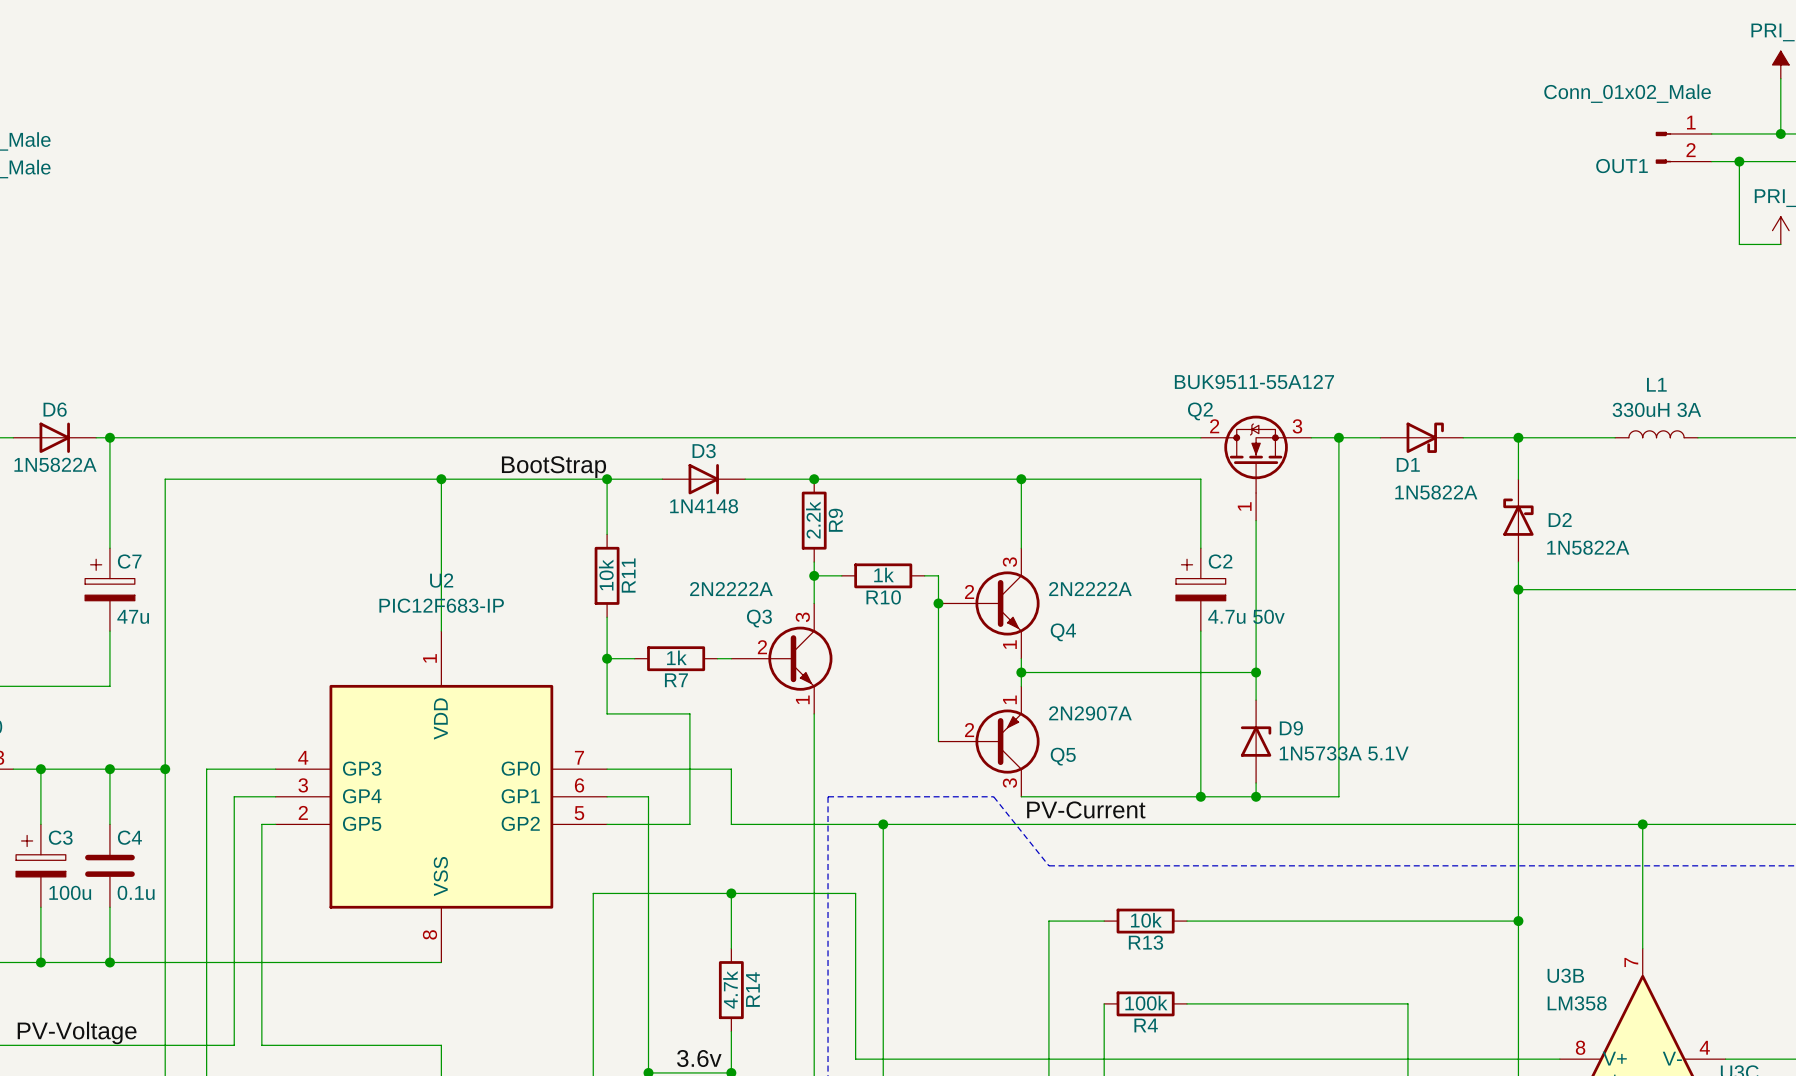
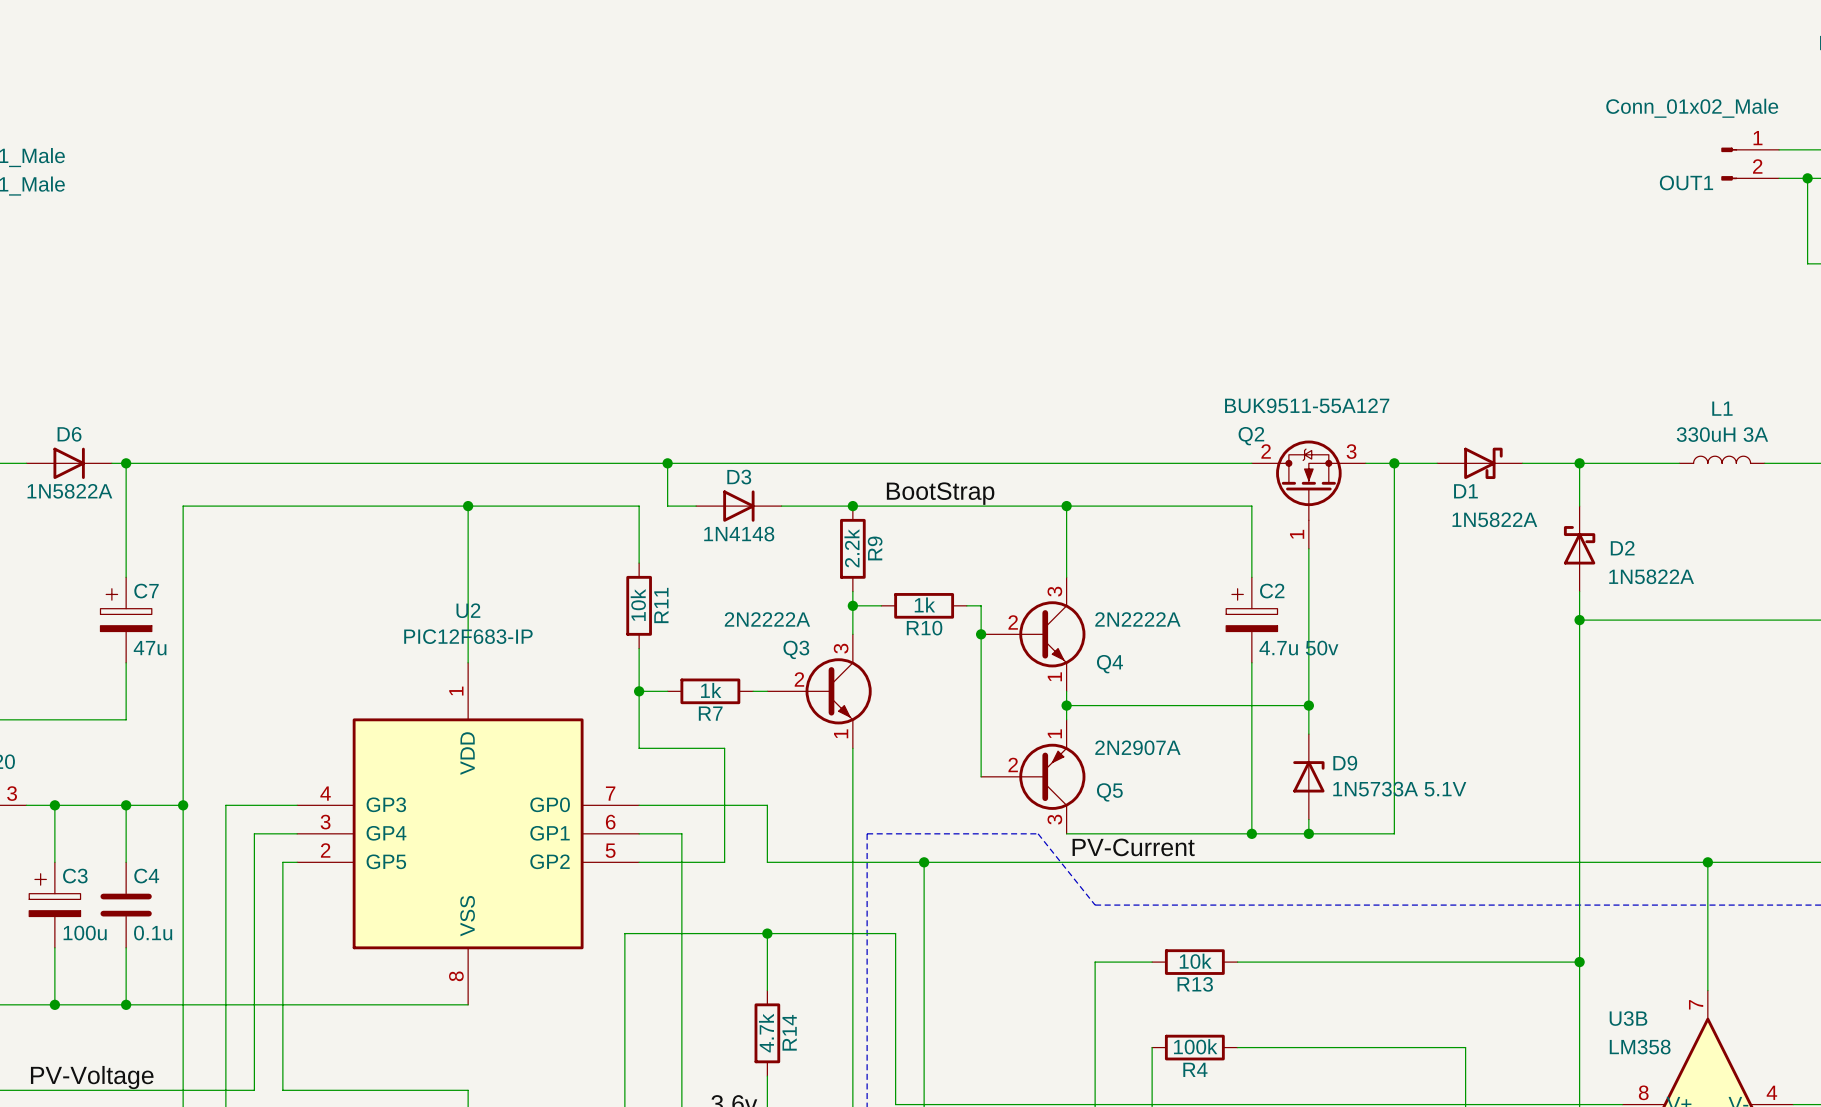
label: BootStrap (554, 467) -> none
label: none -> BootStrap (940, 493)
wire: (607, 479) (634, 479) -> (667, 463) (667, 506)
junction position: (607, 479) -> (667, 463)

